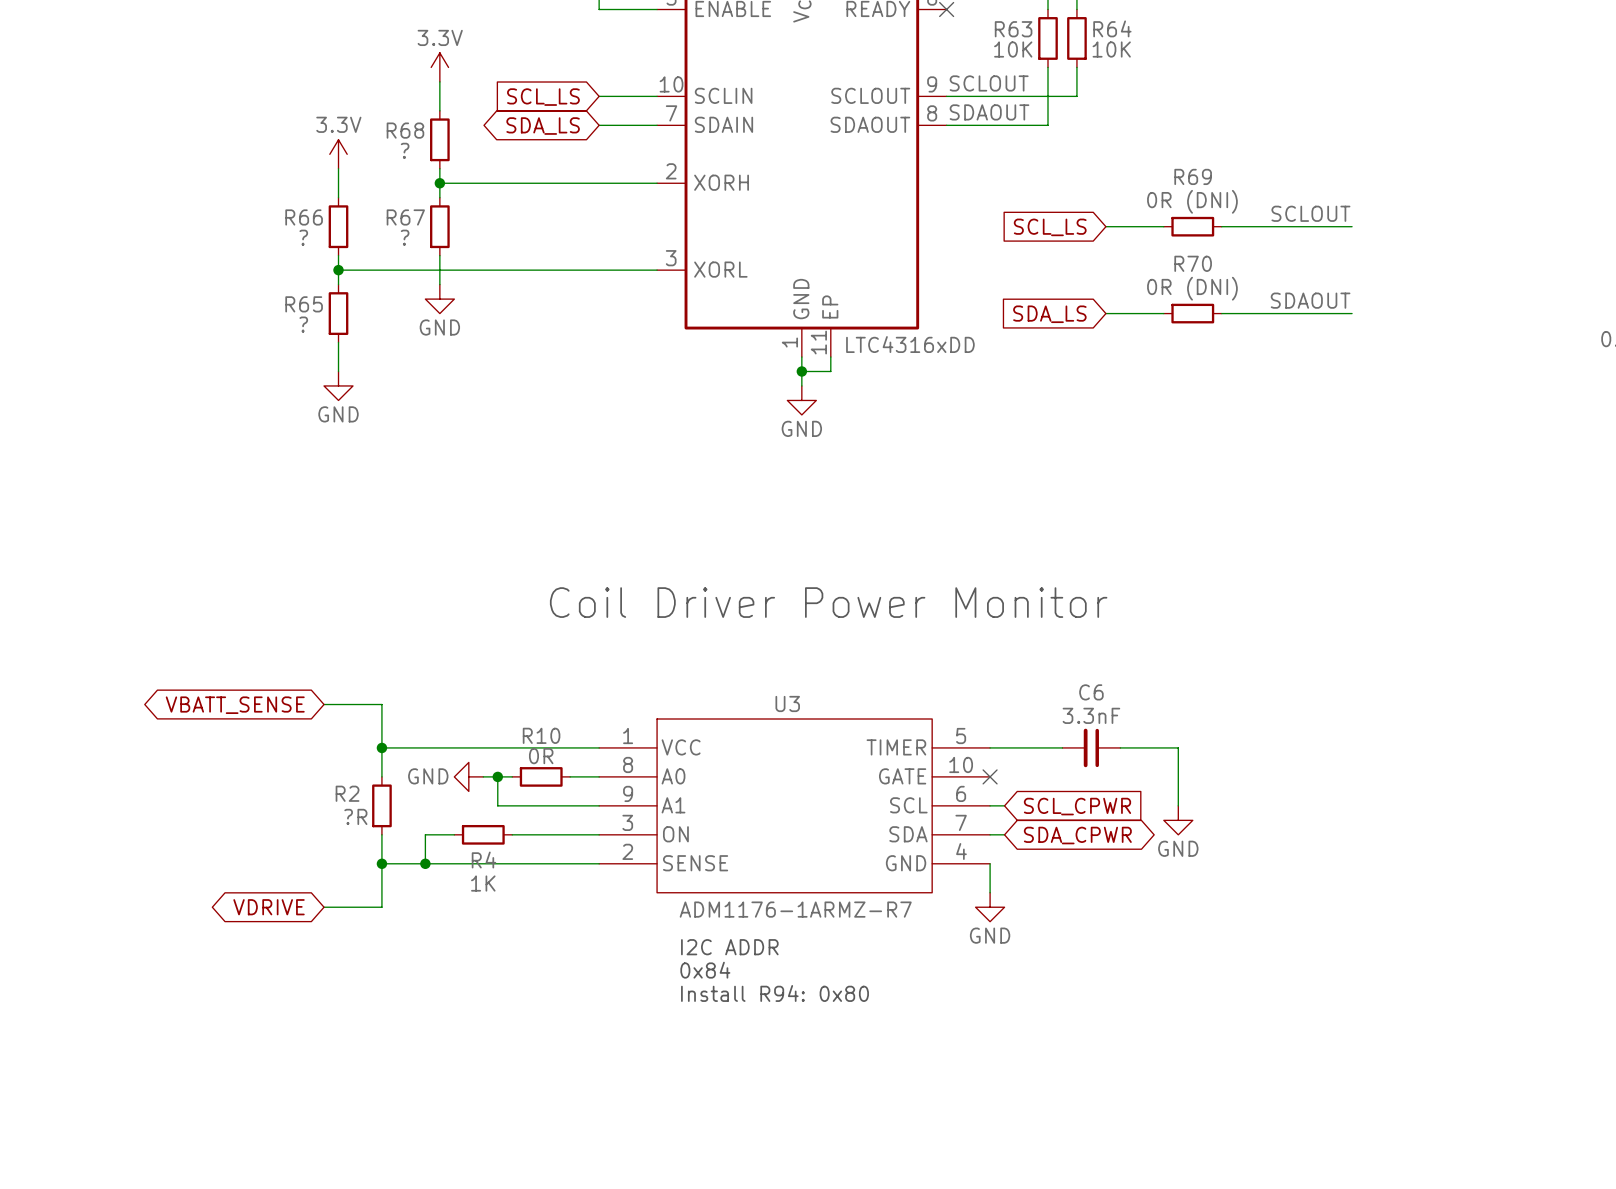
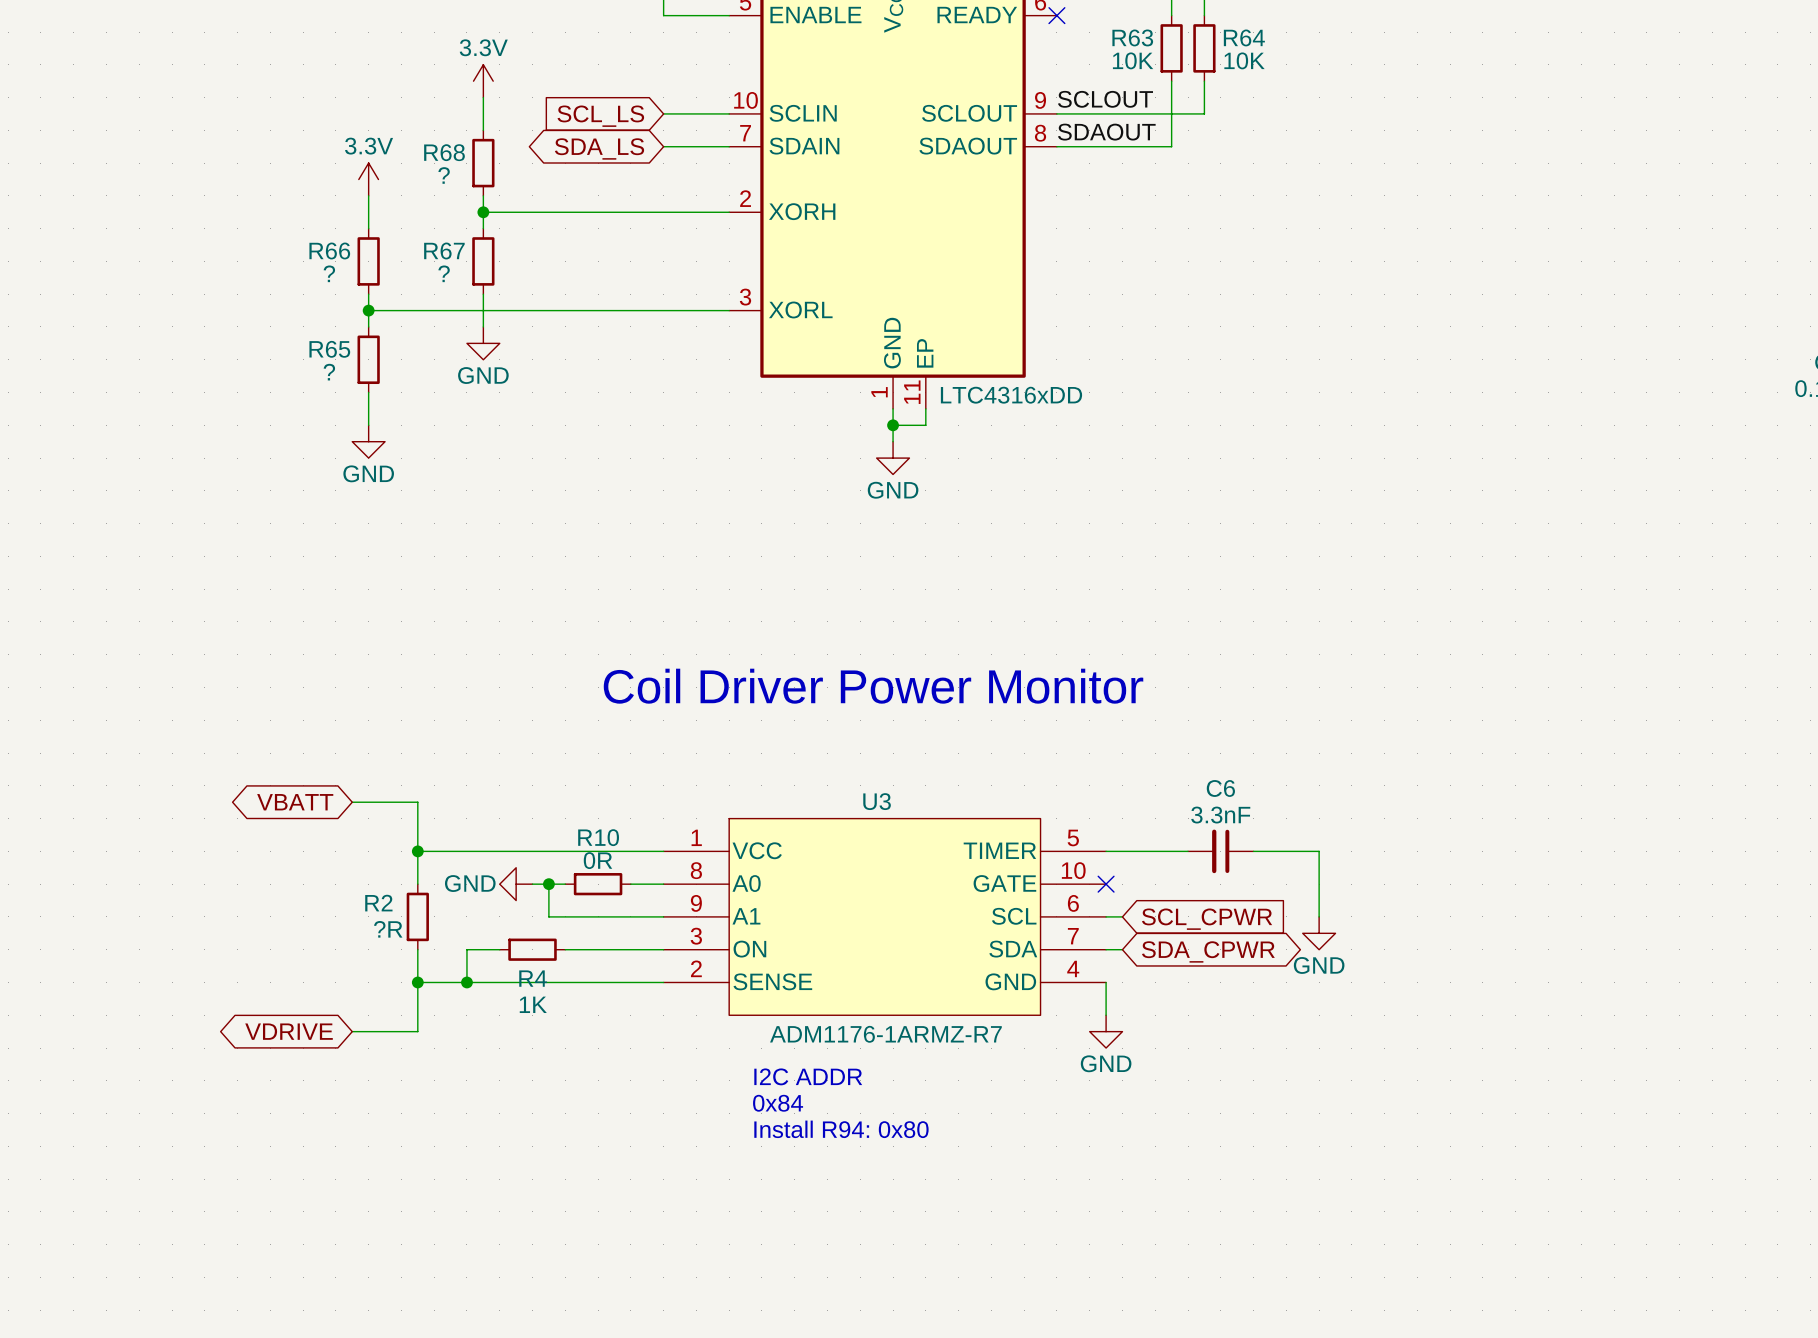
label: SCLOUT (1310, 213) -> none
wire: (1105, 226) (1163, 226) -> none
R69: 0R (DNI) (1192, 226) -> none
wire: (1221, 226) (1352, 226) -> none
global label: SCL_LS (1050, 227) -> none
label: SDAOUT (1310, 300) -> none
wire: (1105, 313) (1163, 313) -> none
R70: 0R (DNI) (1192, 313) -> none
wire: (1221, 313) (1352, 313) -> none
global label: SDA_LS (1049, 314) -> none
global label: VBATT_SENSE (235, 705) -> VBATT (295, 802)

